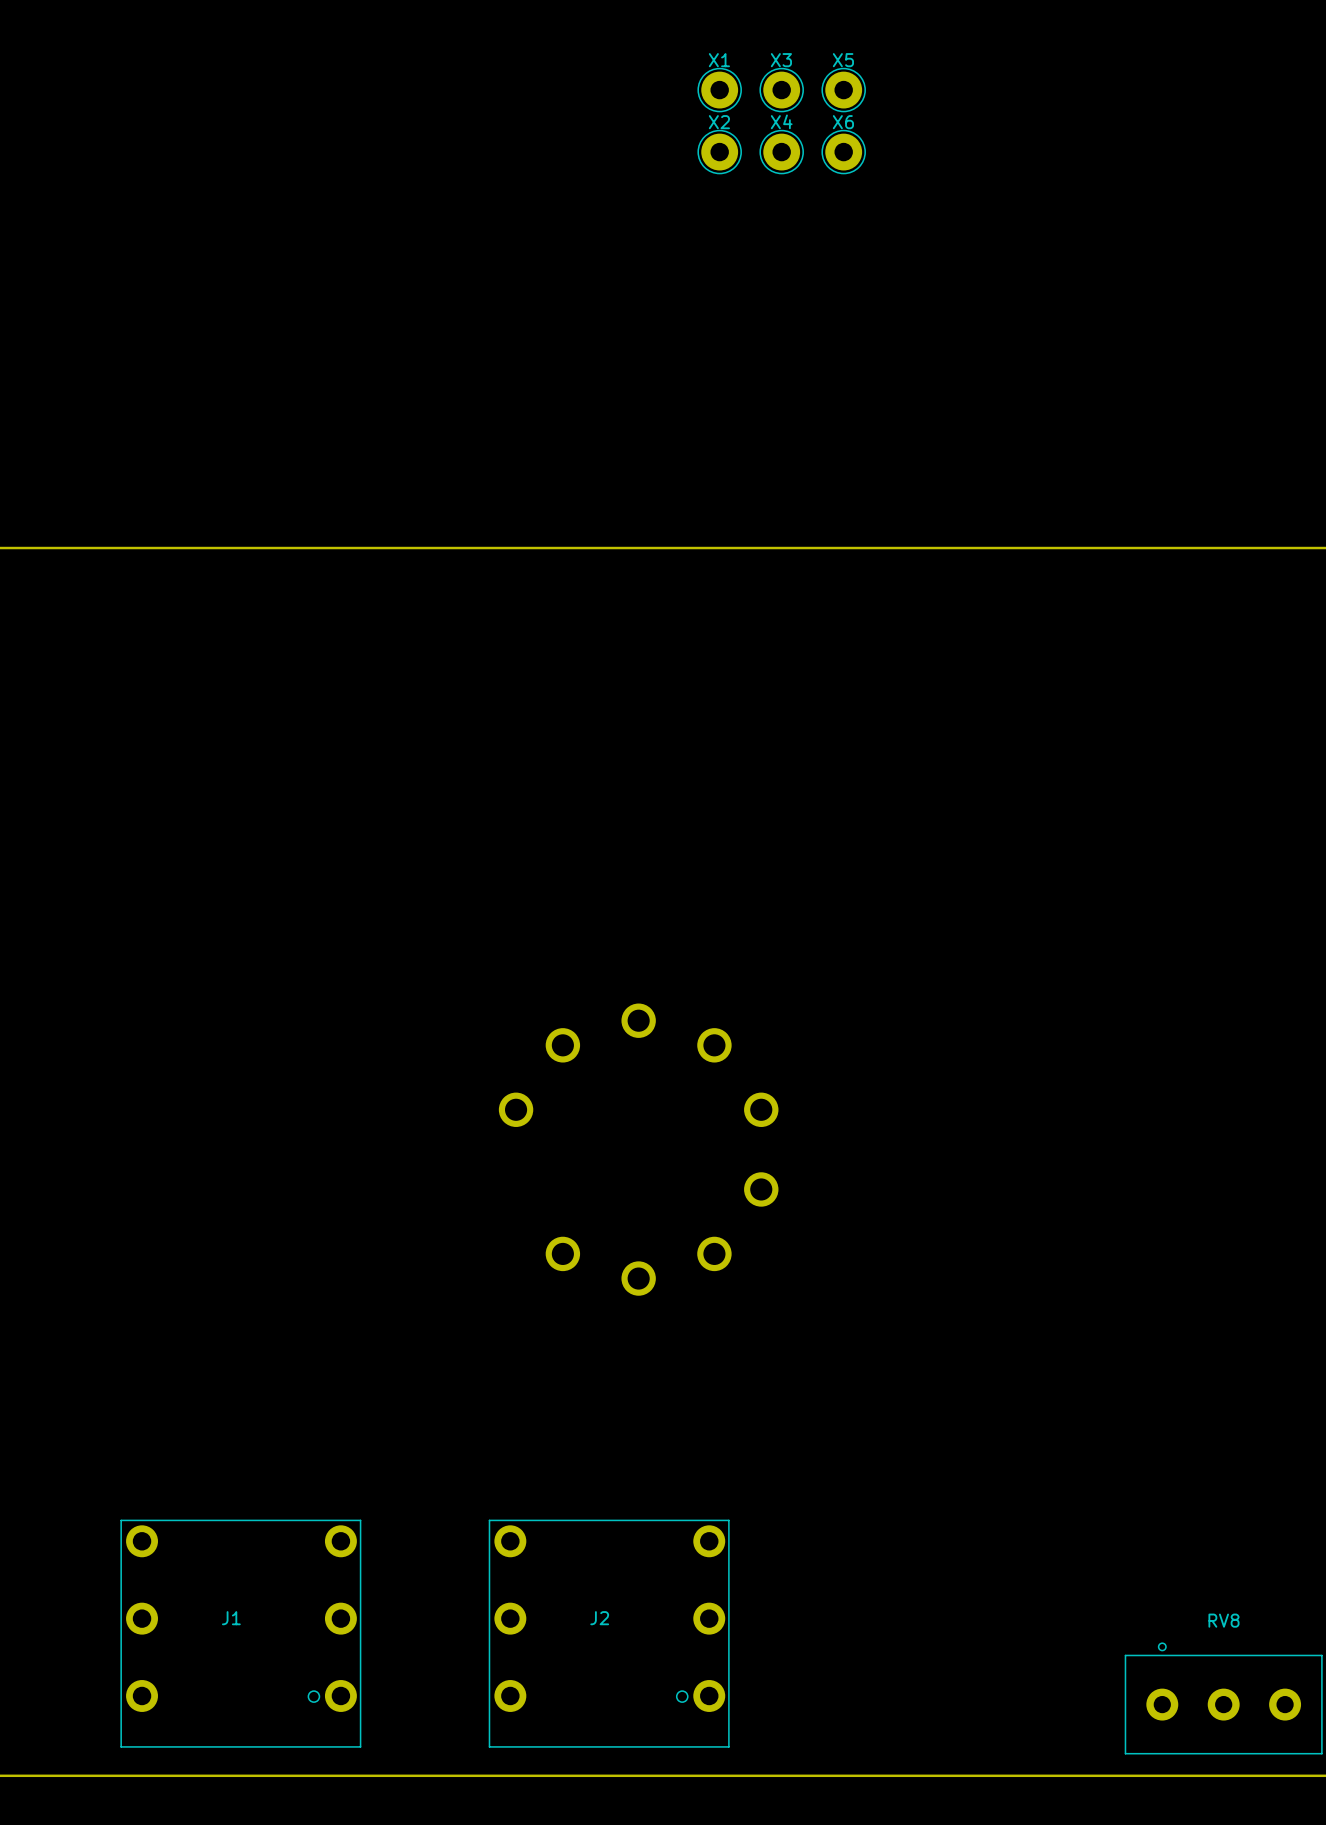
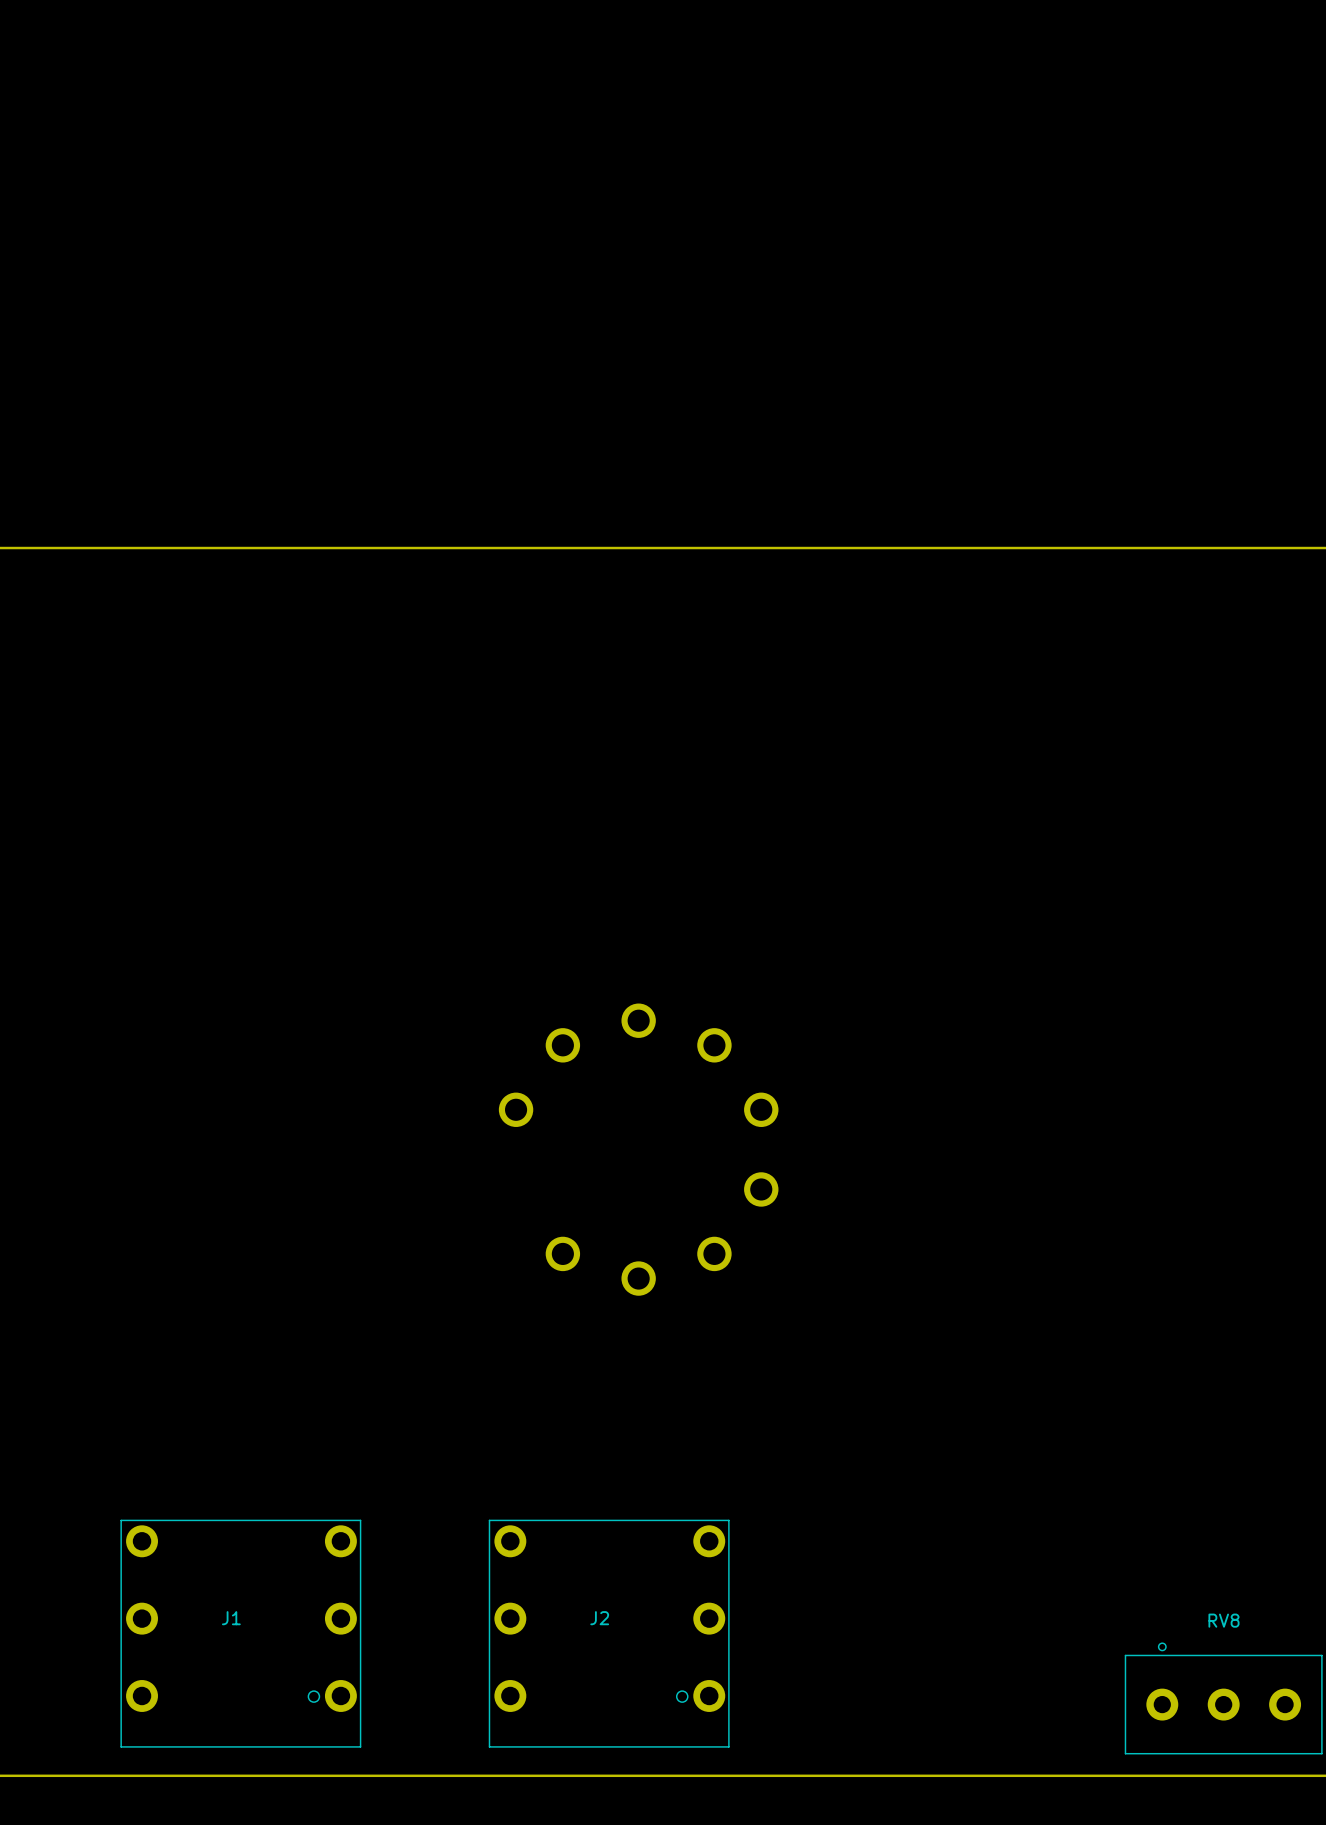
X1: (719, 90) -> none
X3: (781, 90) -> none
X5: (843, 90) -> none
X2: (719, 152) -> none
X4: (781, 152) -> none
X6: (843, 152) -> none

